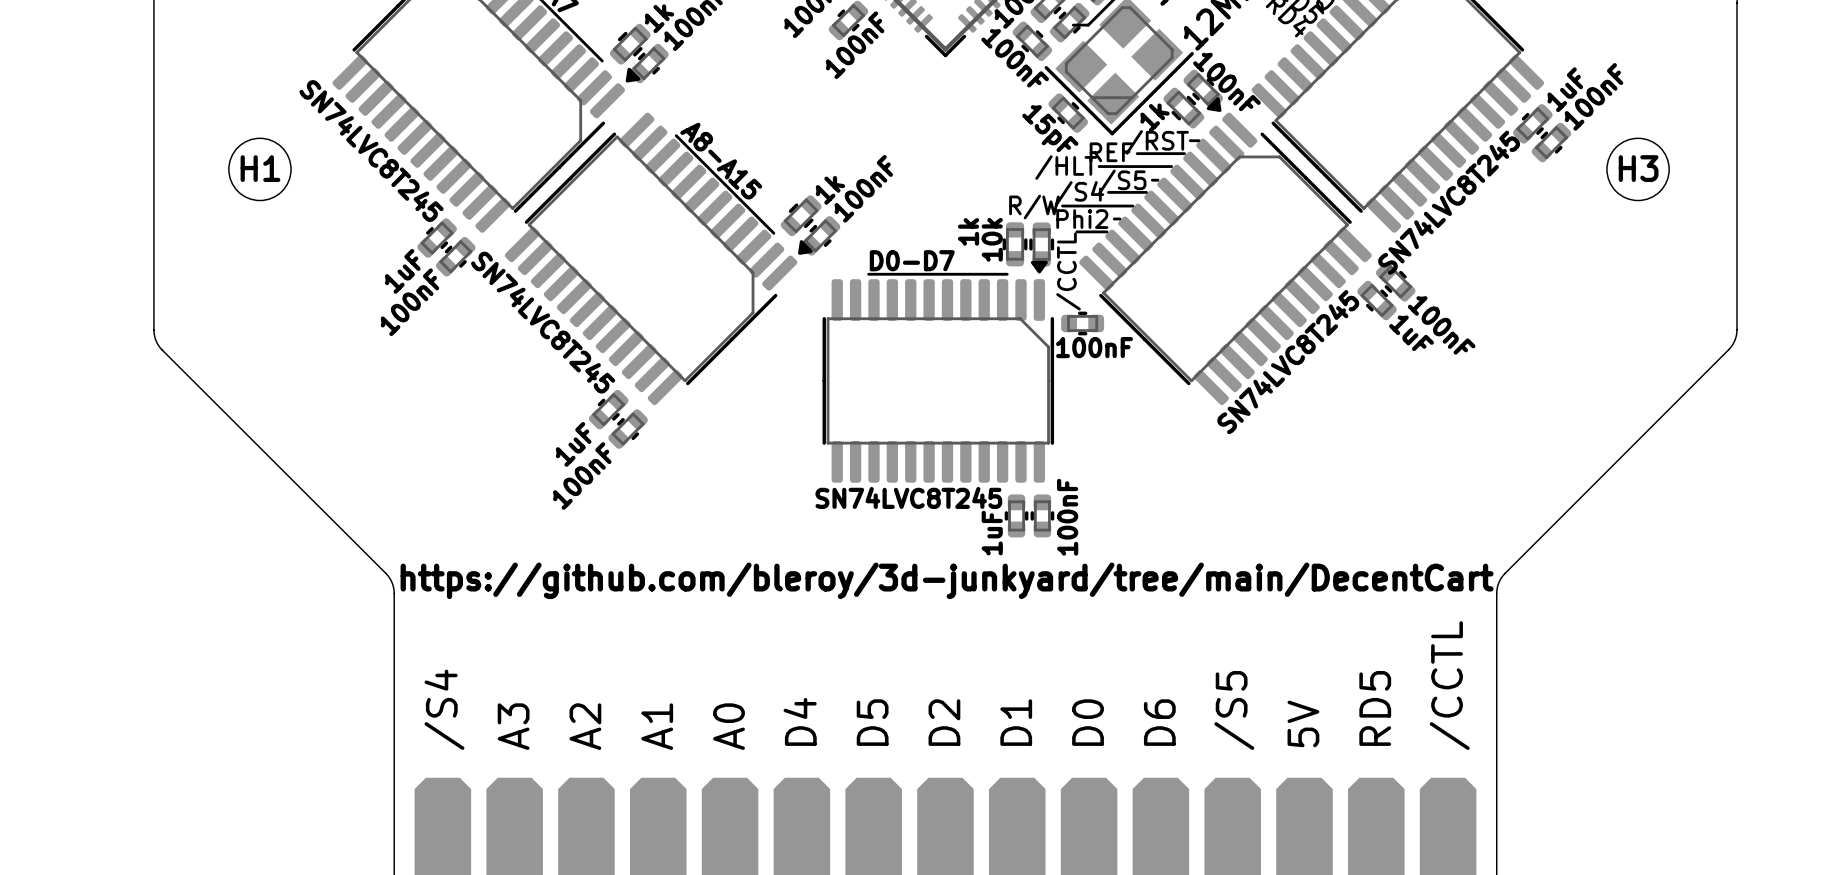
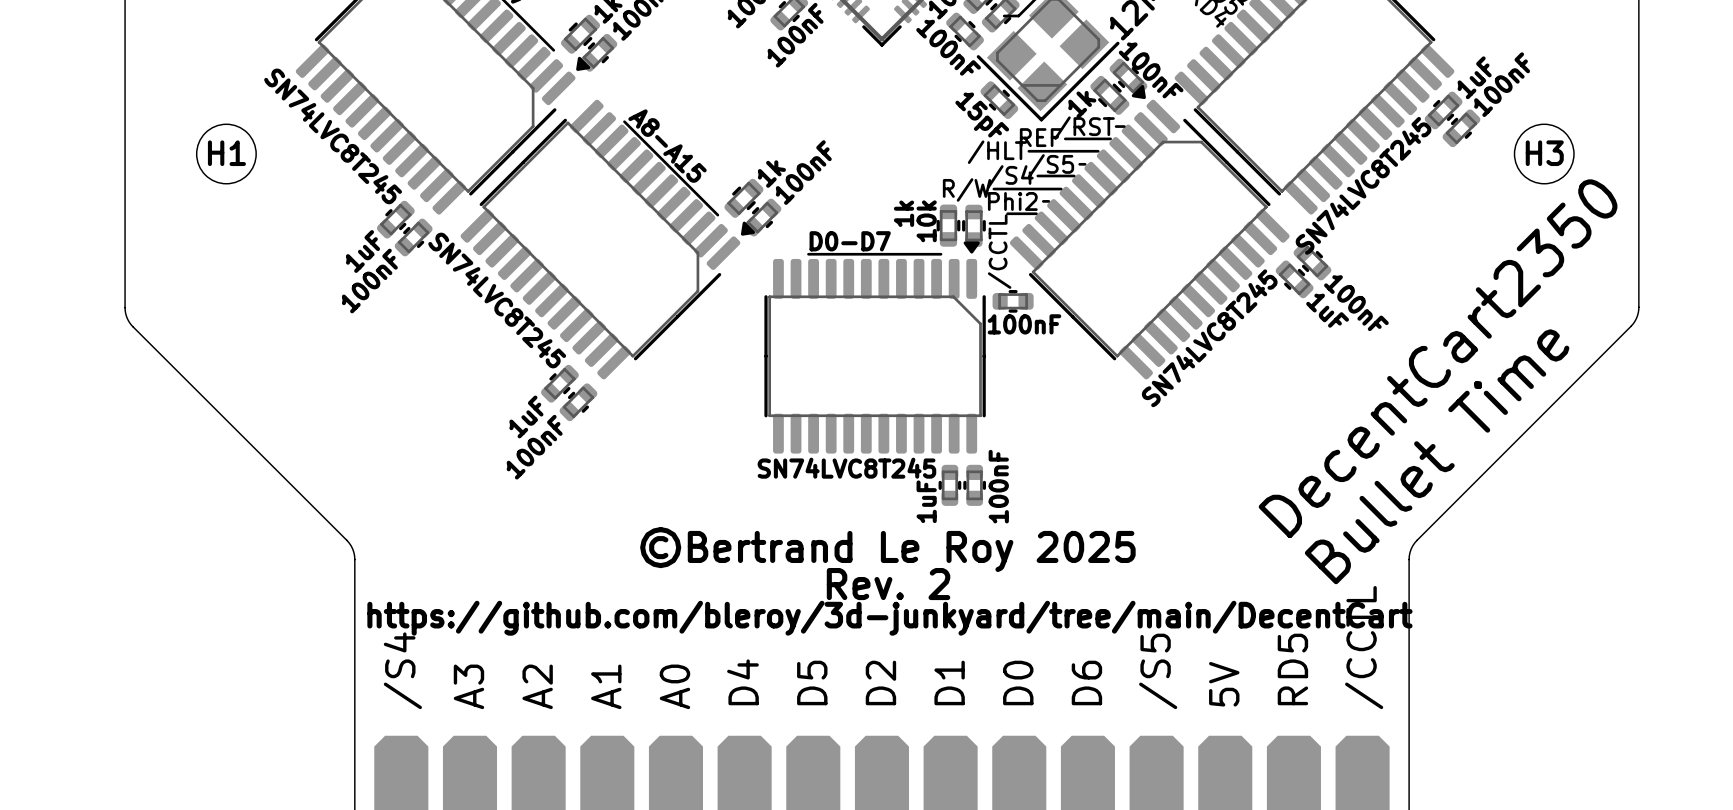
text: none -> DecentCart2350 (1438, 358)
text: none -> Bullet Time (1437, 456)
text: https://github.com/bleroy/3d-junkyard/tree/main/DecentCart (947, 580) -> ©Bertrand Le Roy 2025 (887, 549)
text: none -> Rev. 2 (888, 584)
text: none -> https://github.com/bleroy/3d-junkyard/tree/main/DecentCart (889, 618)

